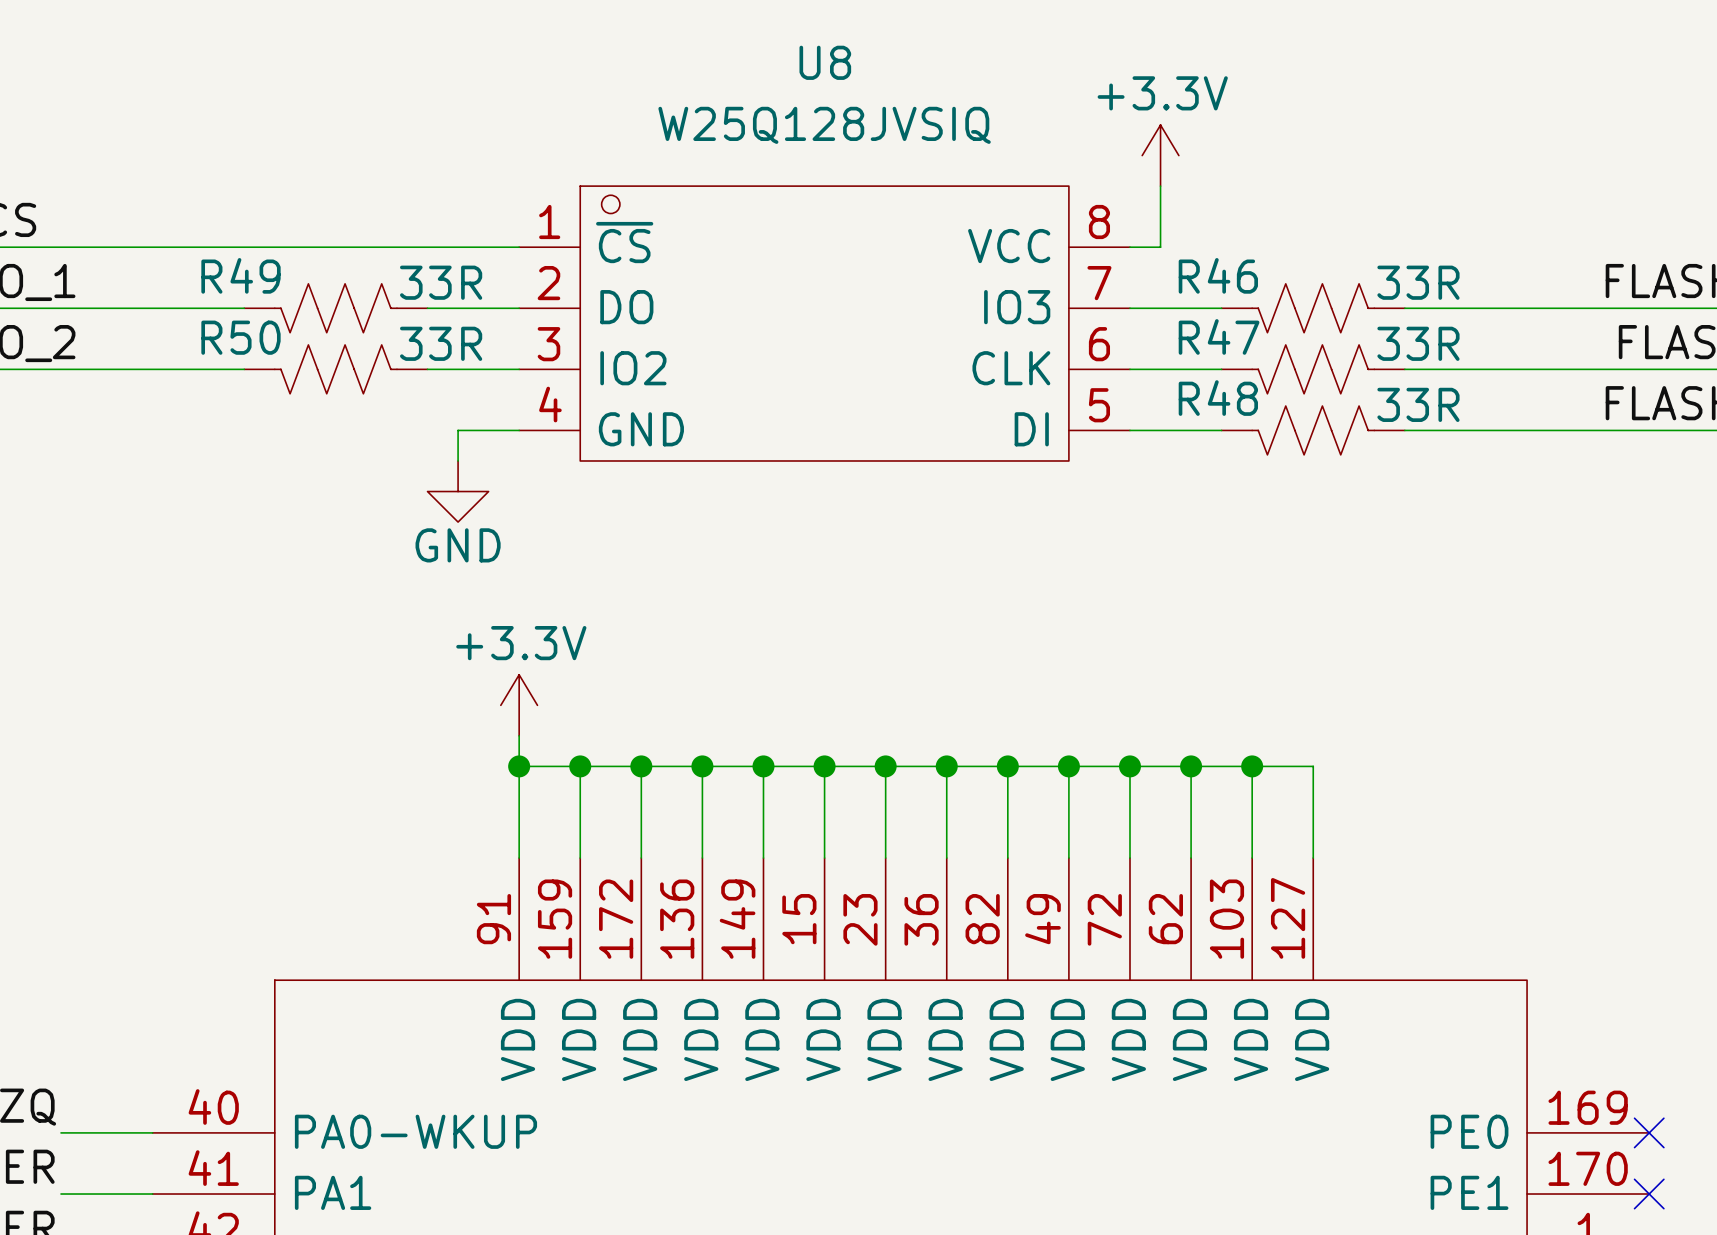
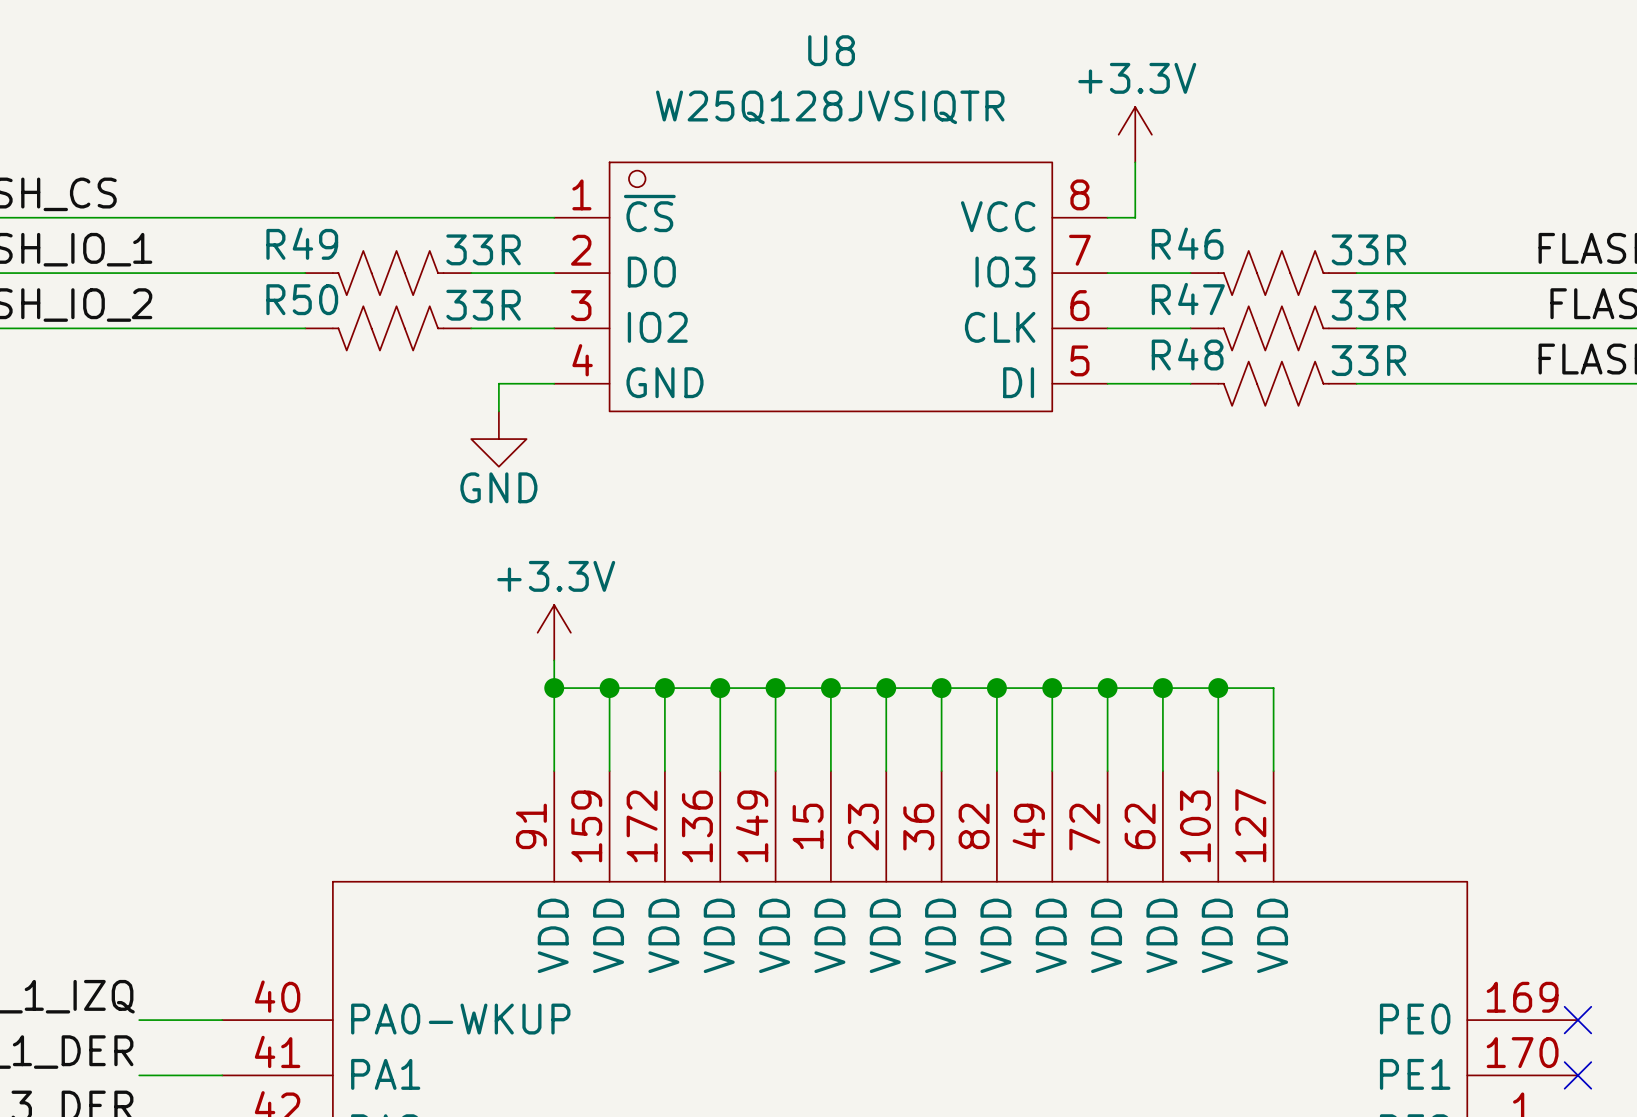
U8 value: W25Q128JVSIQ (824, 125) -> W25Q128JVSIQTR (830, 107)

